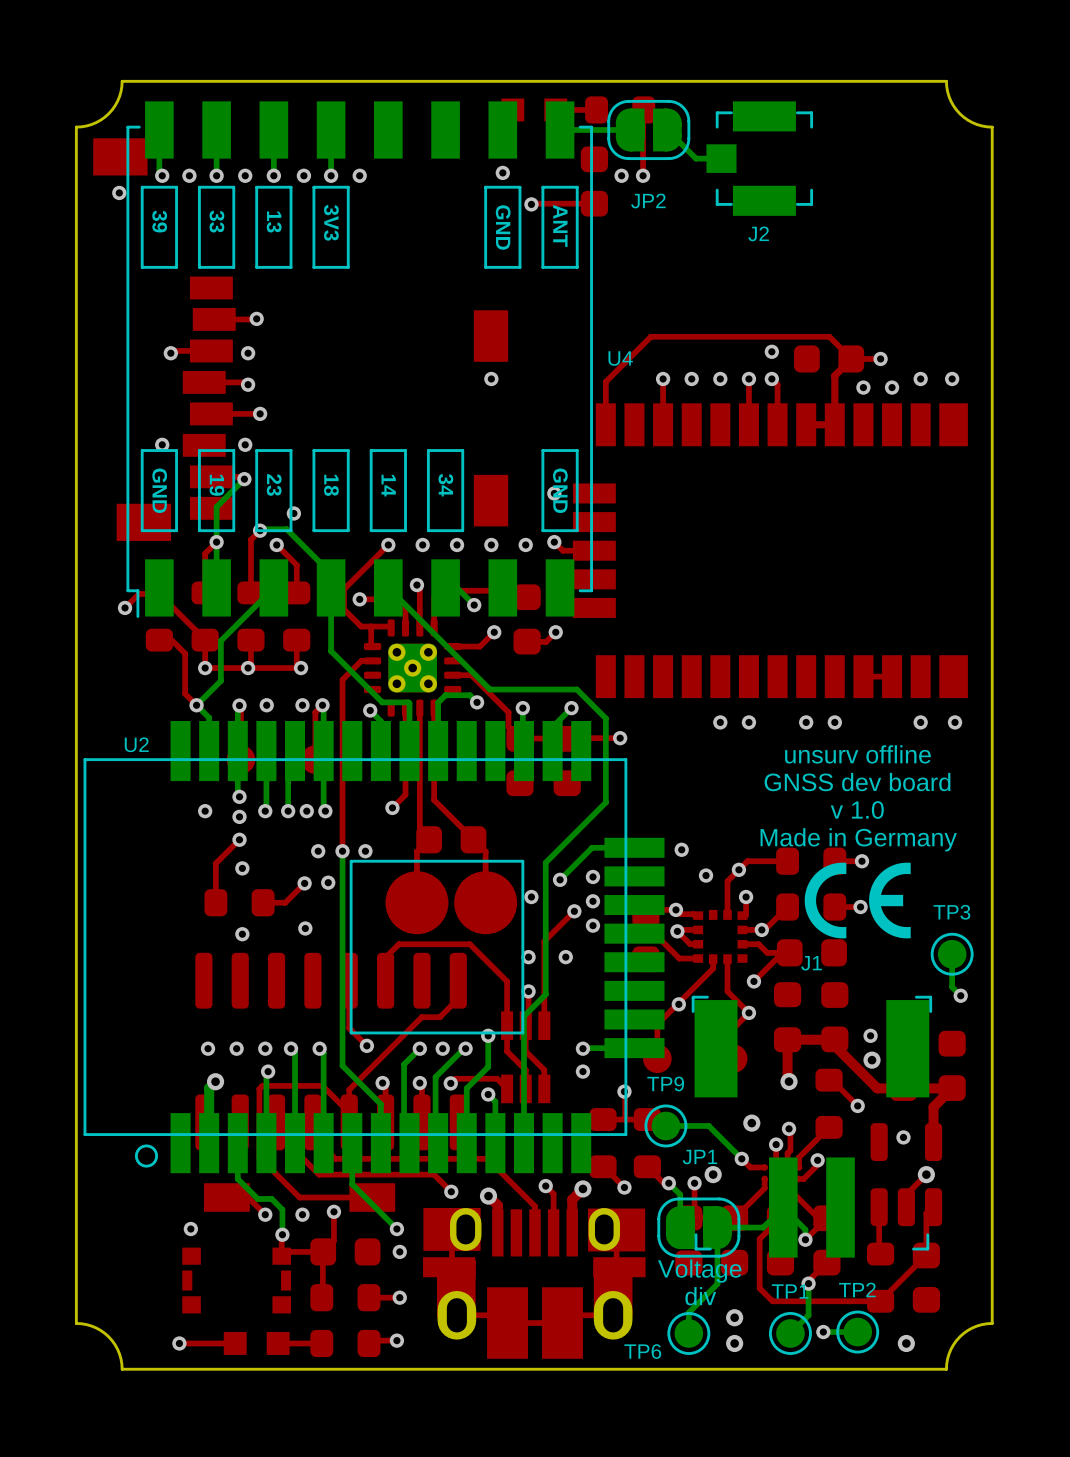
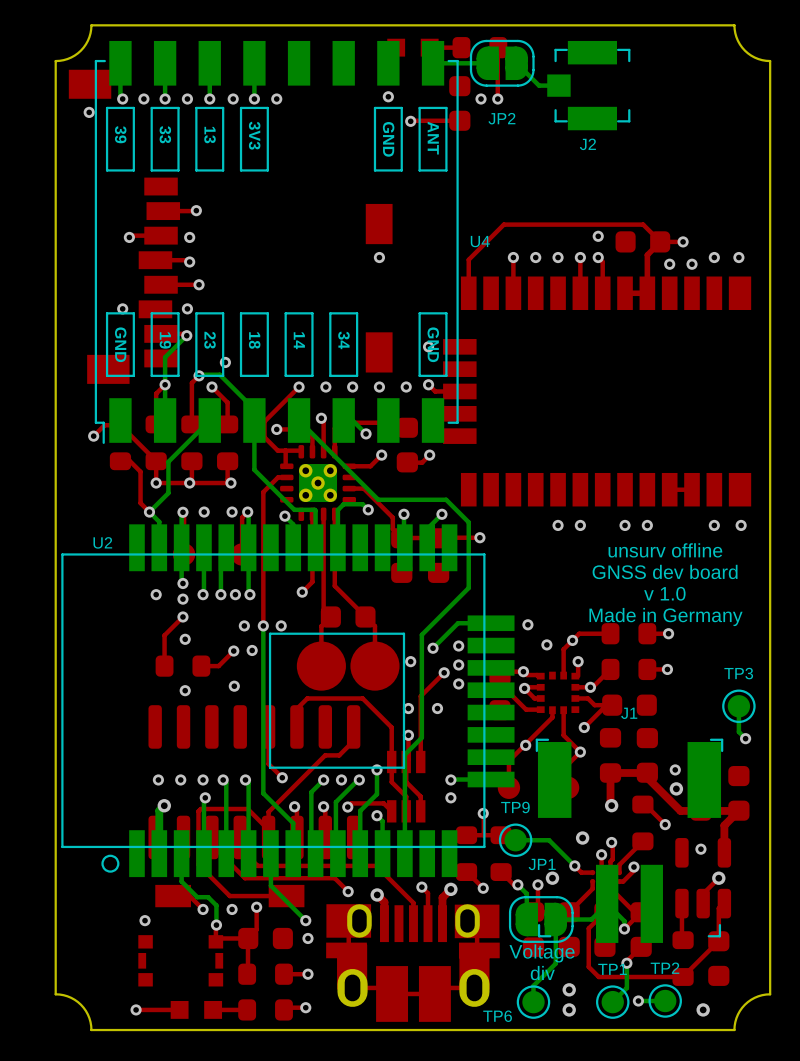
drawing: [804, 862, 911, 939] -> none

